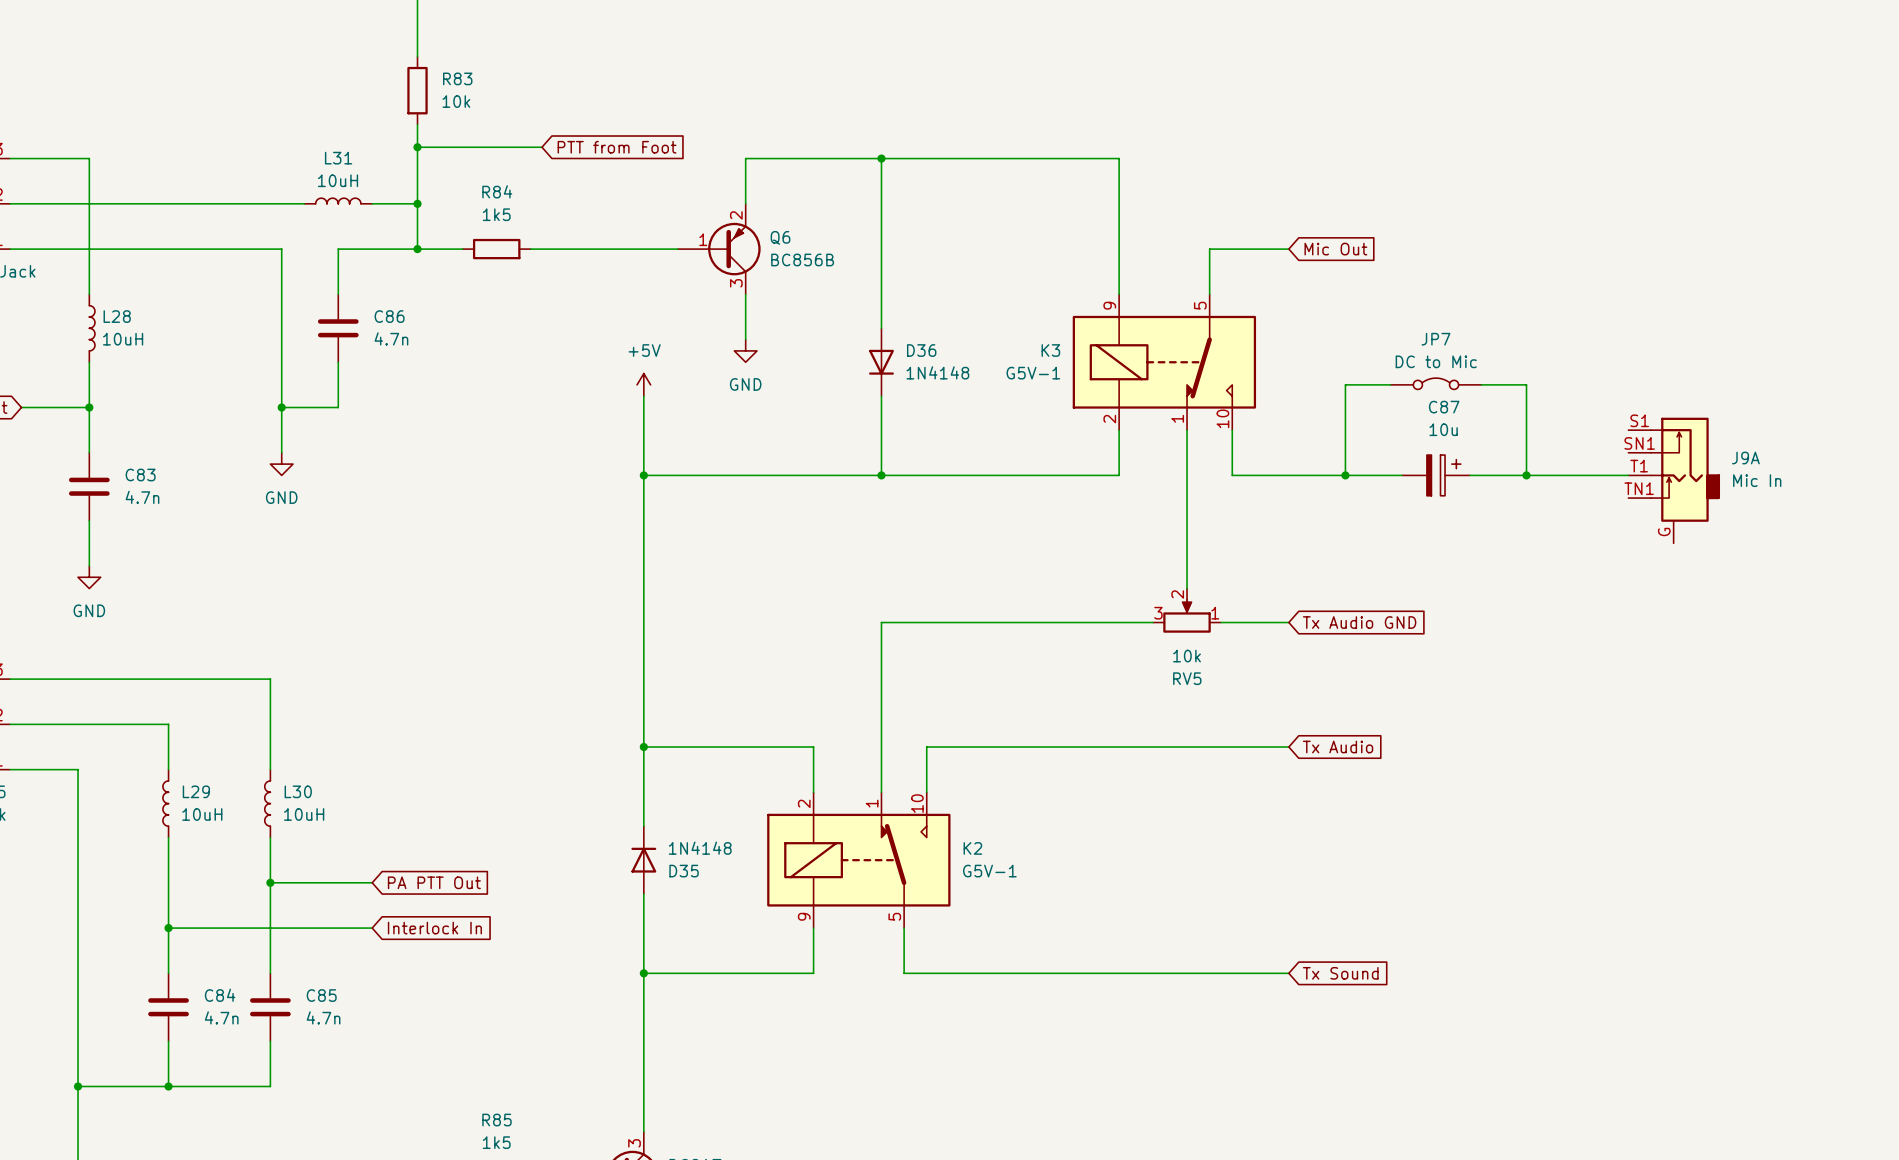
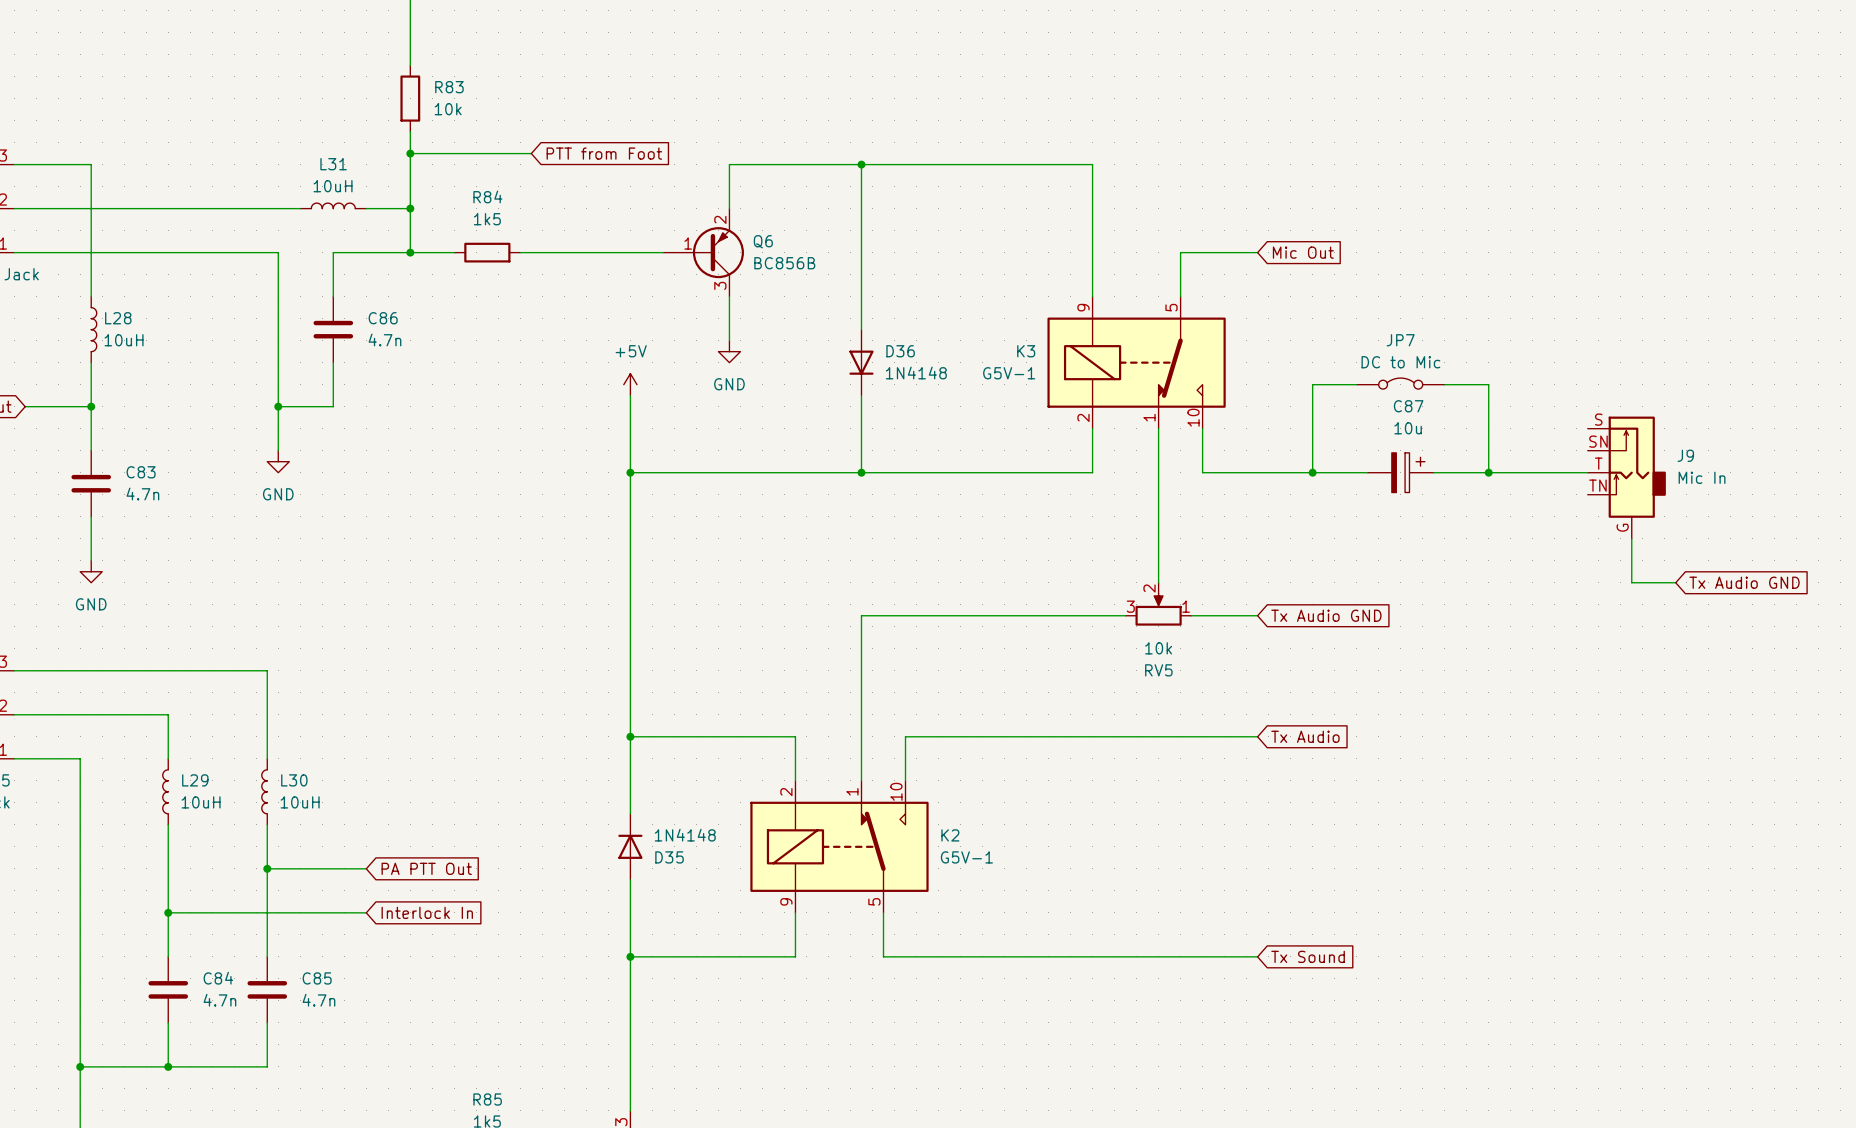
J9: none -> Mic In (1626, 477)
J9A: Mic In (1674, 480) -> none
wire: none -> (1631, 538) (1631, 582) (1675, 582)
global label: none -> Tx Audio GND (1744, 582)

